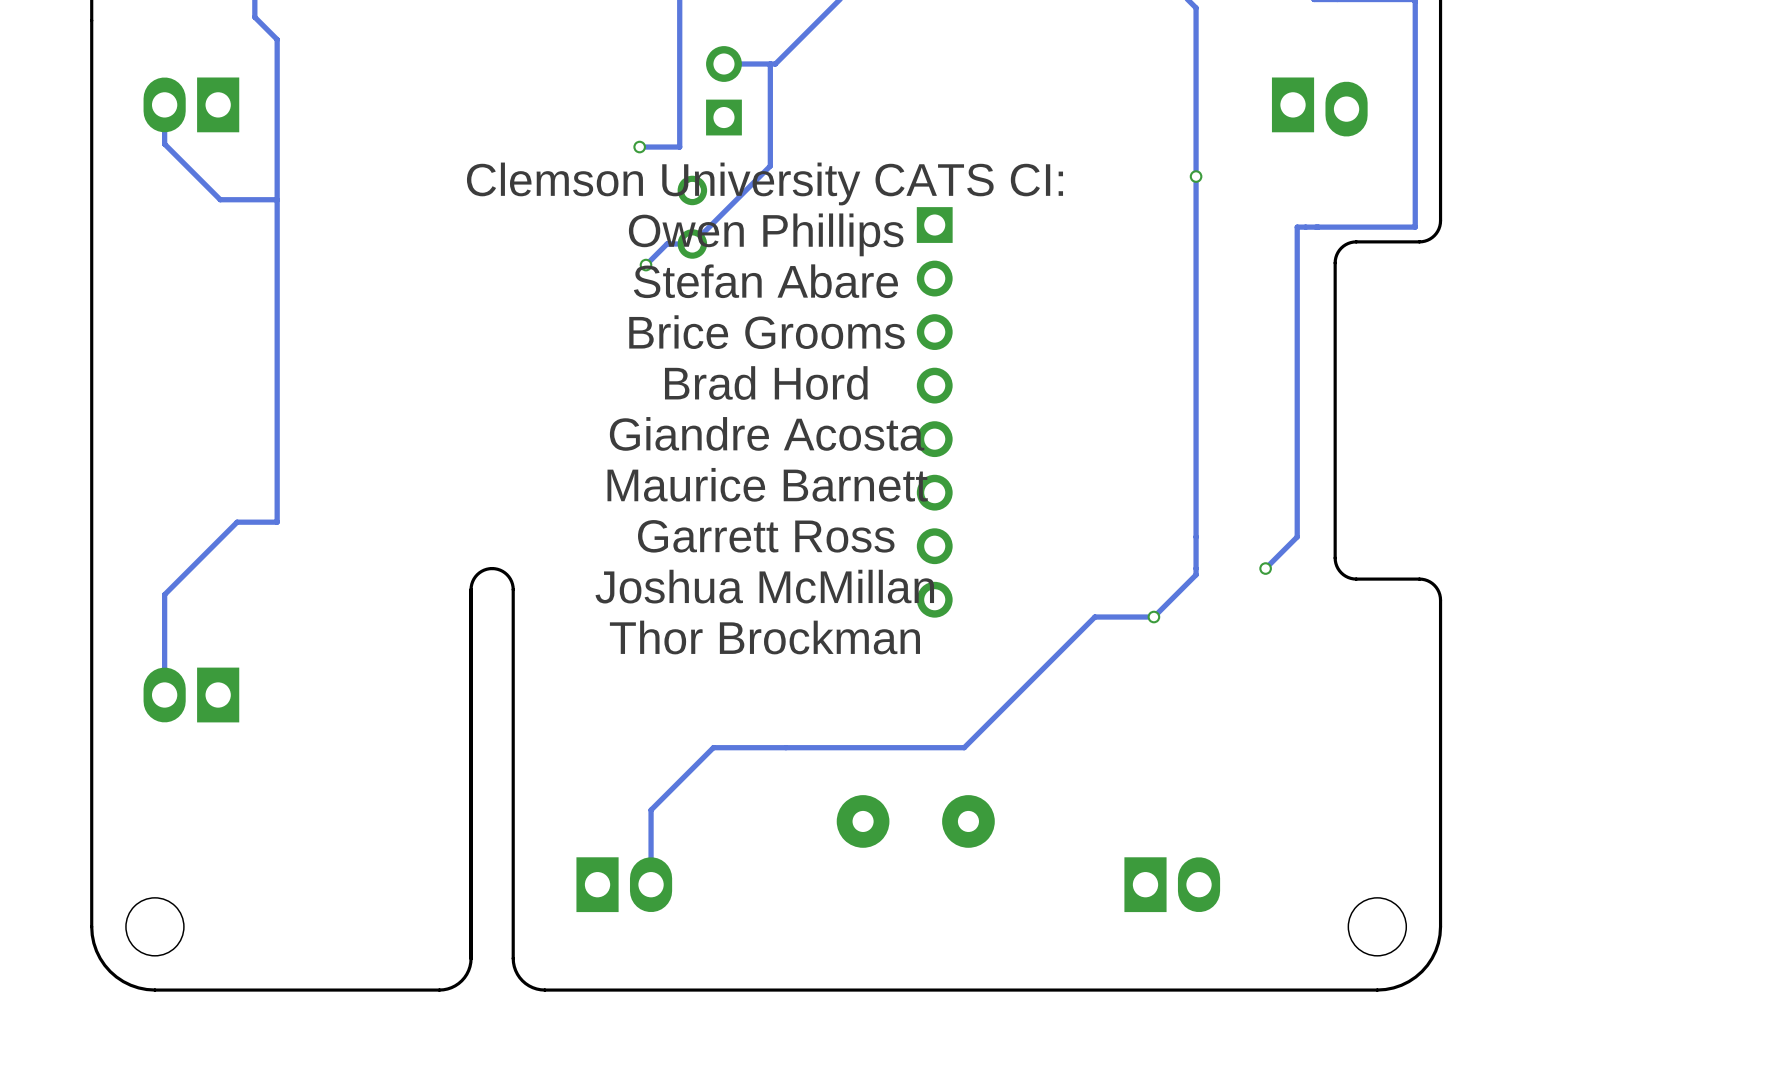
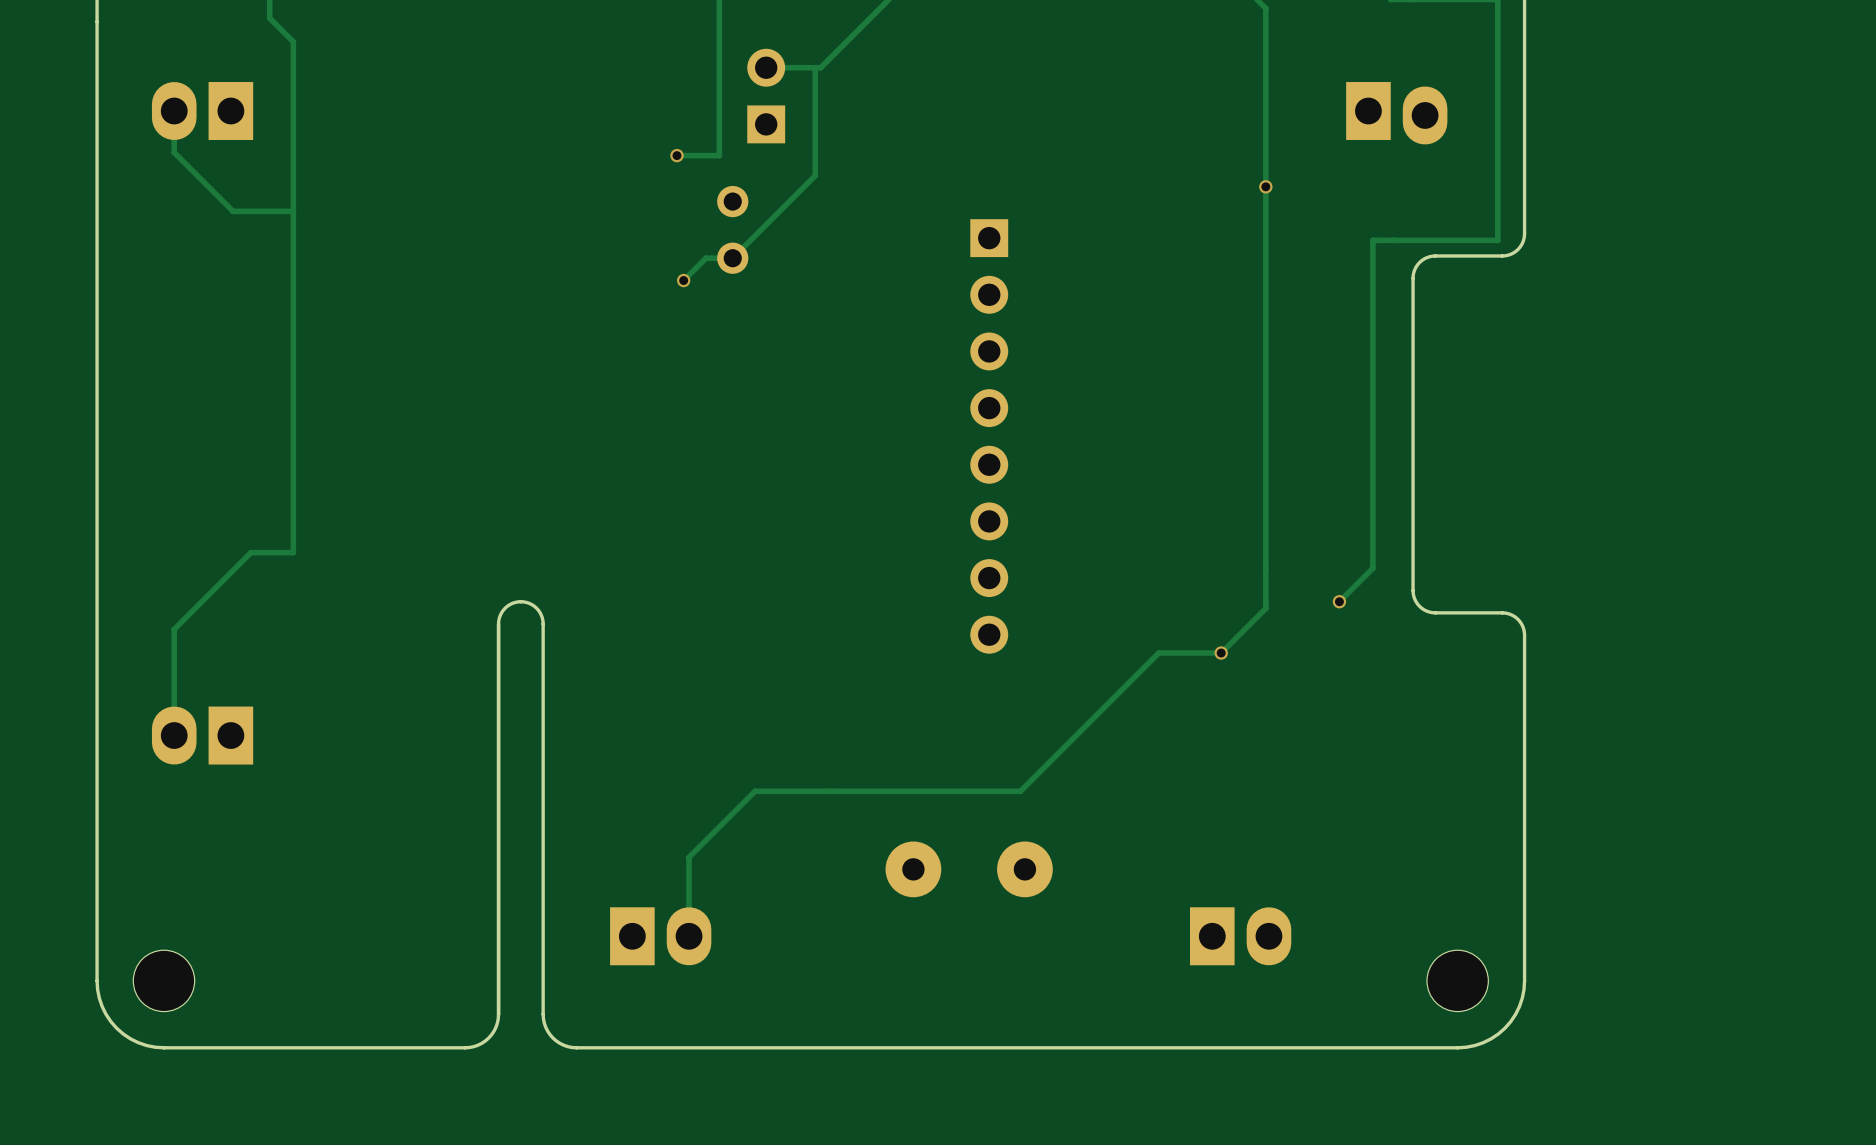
text: Clemson University CATS CI: (764, 183) -> none
text: Owen Phillips (766, 234) -> none
text: Stefan Abare (765, 281) -> none
text: Brice Grooms (766, 332) -> none
text: Brad Hord (766, 383) -> none
text: Giandre Acosta (767, 433) -> none
text: Maurice Barnett (767, 484) -> none
text: Garrett Ross (766, 536) -> none
text: Joshua McMillan (764, 586) -> none
text: Thor Brockman (764, 637) -> none

